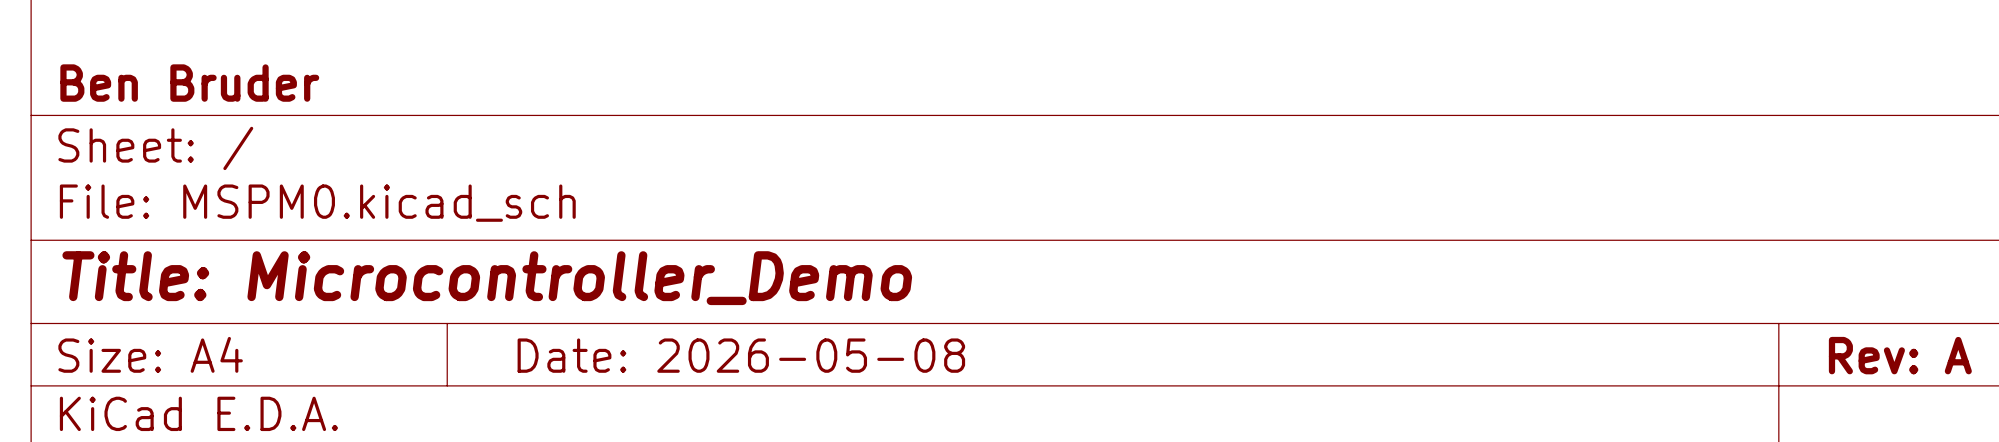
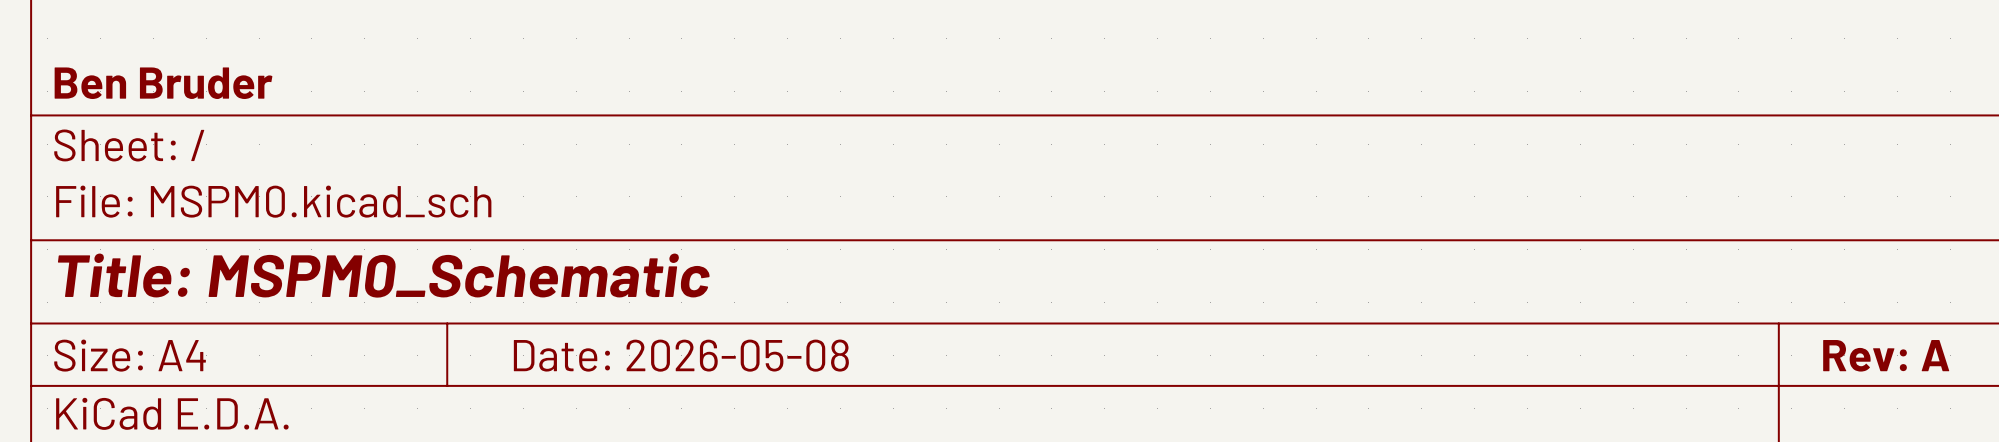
title block: Title: Microcontroller_Demo (487, 278) -> Title: MSPM0_Schematic (383, 275)

